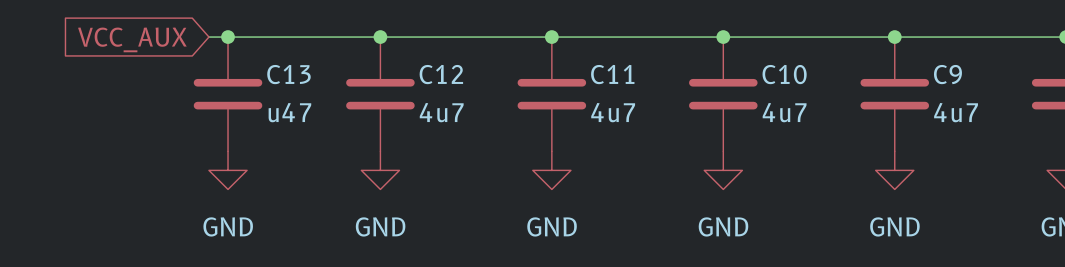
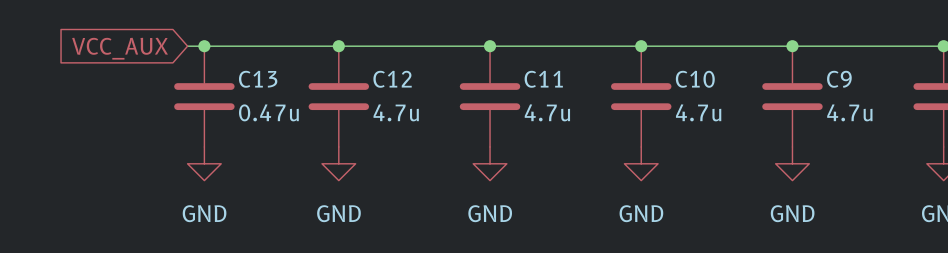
C13 value: u47 (289, 112) -> 0.47u (268, 112)
C12 value: 4u7 (441, 112) -> 4.7u (396, 112)
C11 value: 4u7 (613, 112) -> 4.7u (547, 112)
C10 value: 4u7 (784, 112) -> 4.7u (698, 112)
C9 value: 4u7 (956, 112) -> 4.7u (849, 112)

